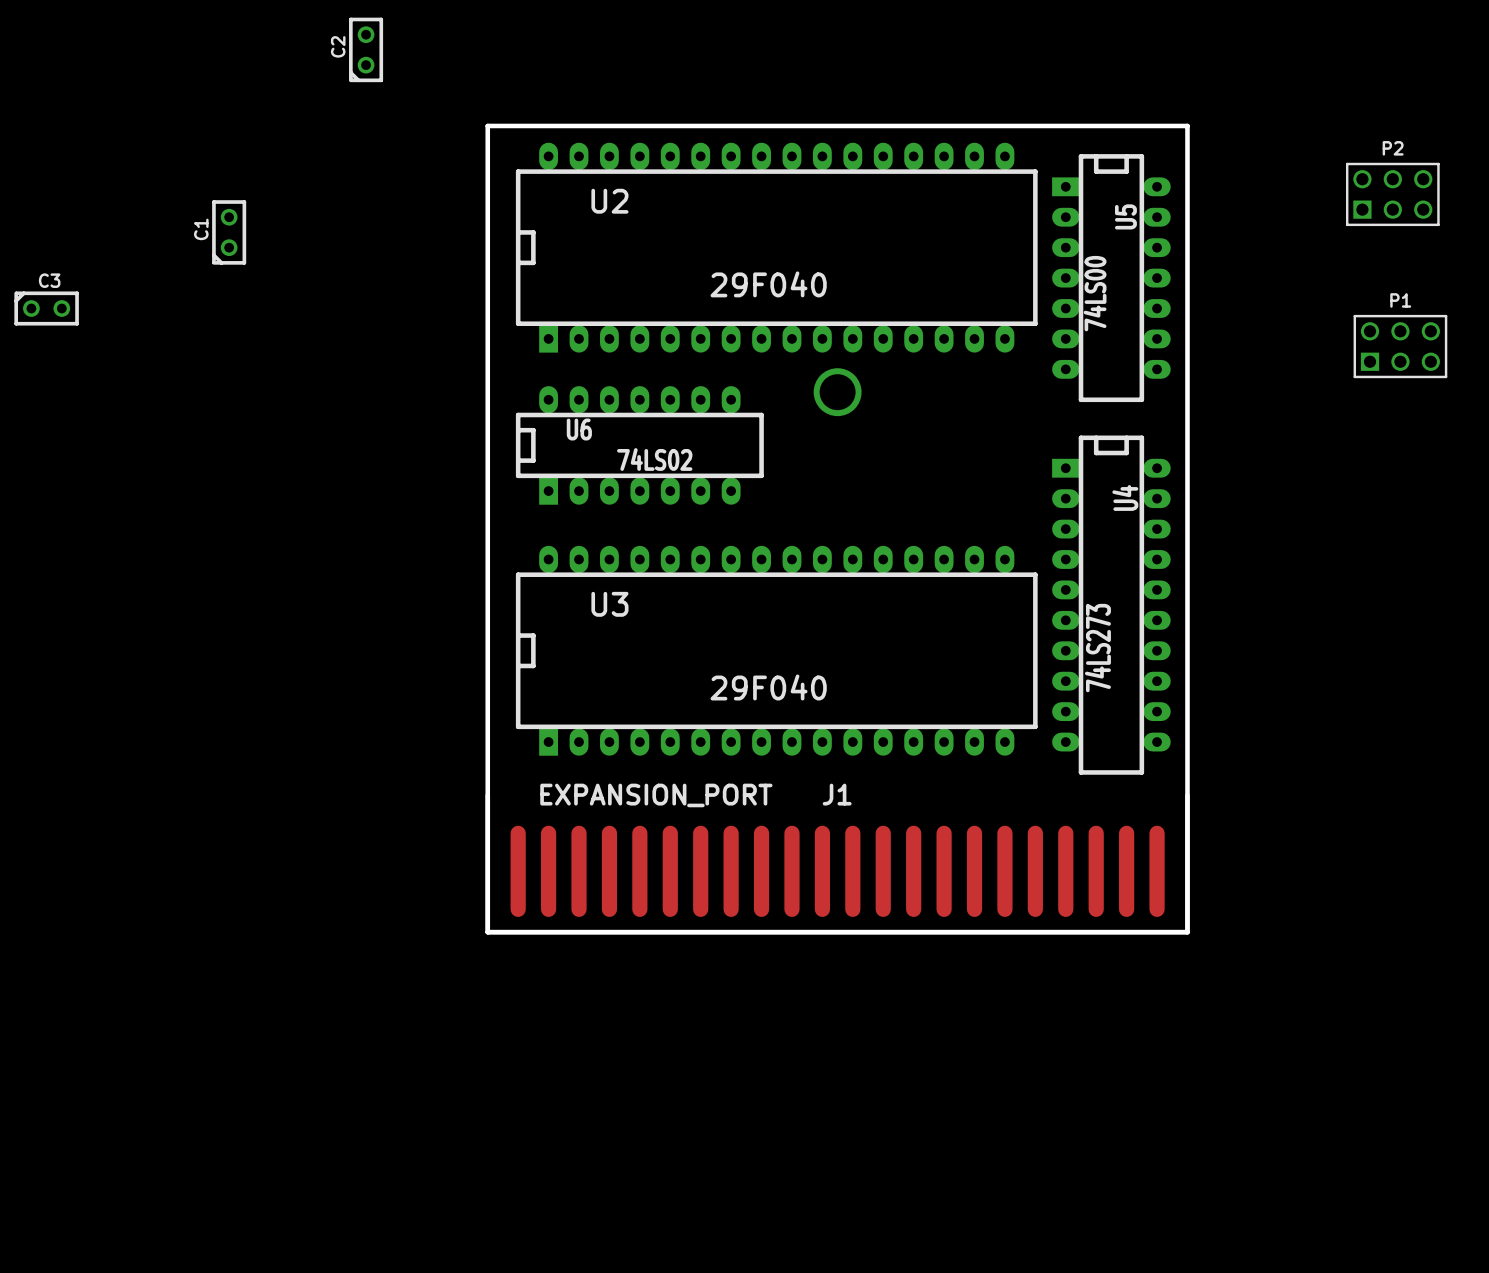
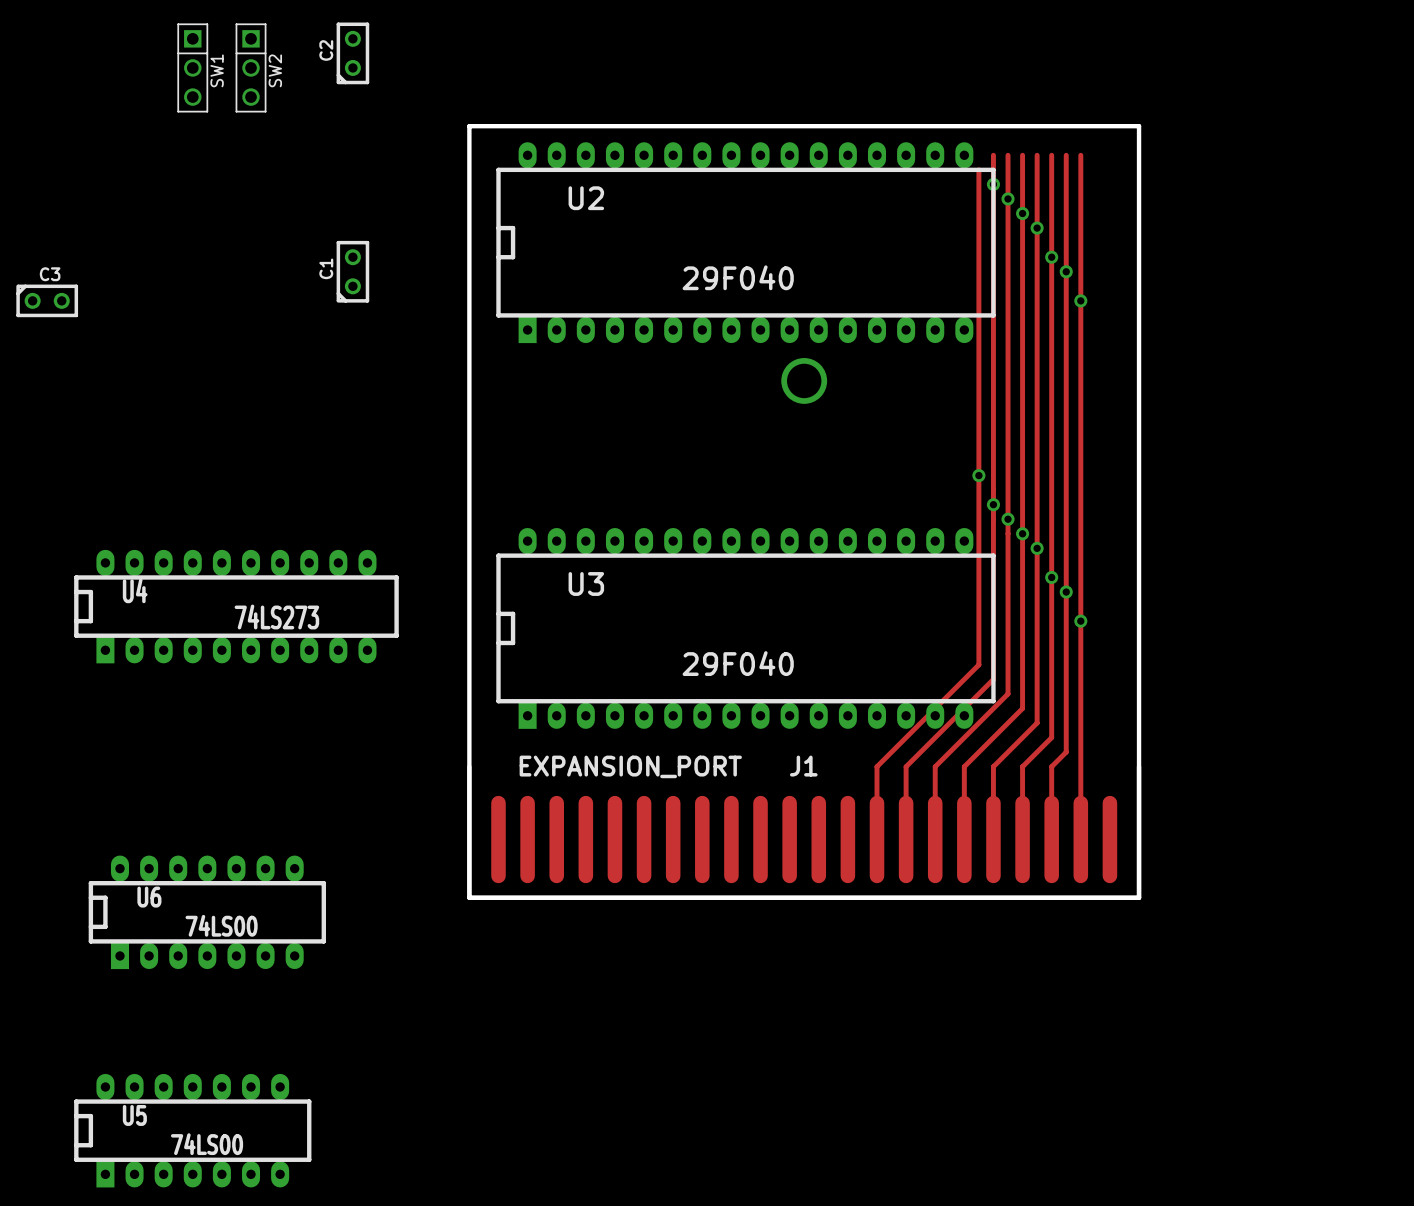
SW1: none -> (192, 67)
SW2: none -> (251, 67)
track: none -> (993, 155) (993, 679) (906, 766) (906, 839)
track: none -> (1008, 155) (1008, 693) (935, 766) (935, 839)
track: none -> (1022, 155) (1022, 708) (964, 766) (964, 839)
track: none -> (1037, 155) (1037, 723) (993, 766) (993, 839)
track: none -> (1051, 155) (1051, 737) (1022, 766) (1022, 839)
track: none -> (1066, 155) (1066, 752) (1051, 766) (1051, 839)
track: none -> (1080, 155) (1080, 839)
track: none -> (978, 169) (978, 664) (876, 766) (876, 839)
via: none -> (993, 184)
P2: (1392, 194) -> none
via: none -> (1008, 198)
via: none -> (1022, 213)
C1 position: (229, 232) -> (352, 271)
via: none -> (1037, 228)
via: none -> (1051, 257)
U5 rotation: 0° (1111, 278) -> 90° counterclockwise (192, 1130)
U5 position: (1111, 278) -> (192, 1130)
via: none -> (1066, 271)
via: none -> (1080, 300)
P1: (1400, 346) -> none
U6 position: (639, 445) -> (207, 912)
U6 value: 74LS02 (654, 459) -> 74LS00 (221, 925)
via: none -> (978, 475)
via: none -> (993, 504)
via: none -> (1008, 519)
via: none -> (1022, 533)
via: none -> (1037, 548)
via: none -> (1051, 577)
U4 rotation: 0° (1111, 605) -> 90° counterclockwise (236, 606)
U4 position: (1111, 605) -> (236, 606)
via: none -> (1066, 592)
via: none -> (1080, 621)

